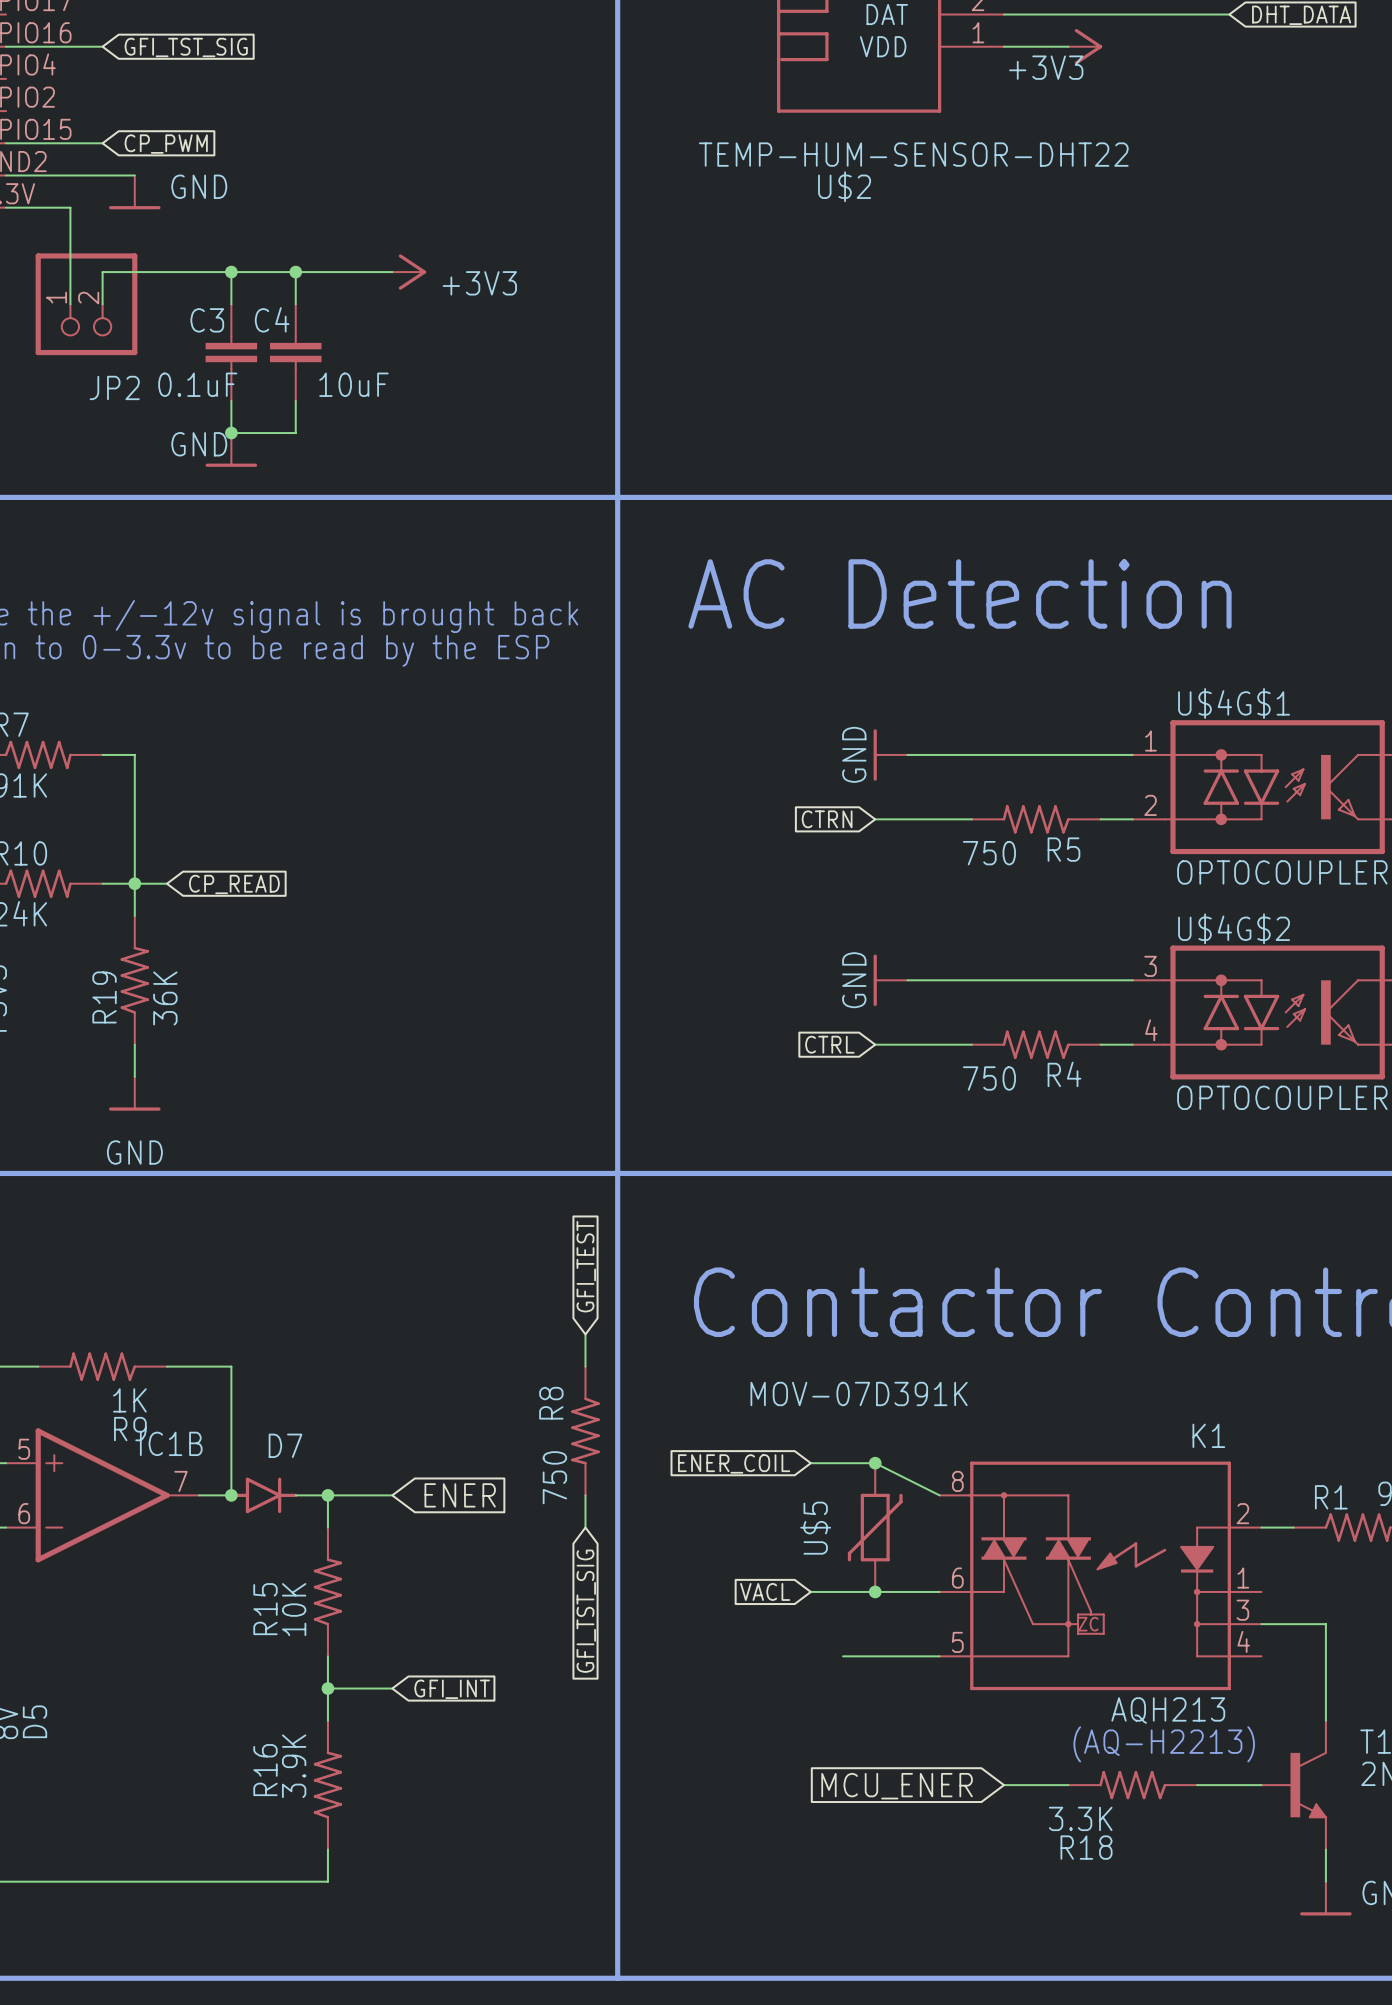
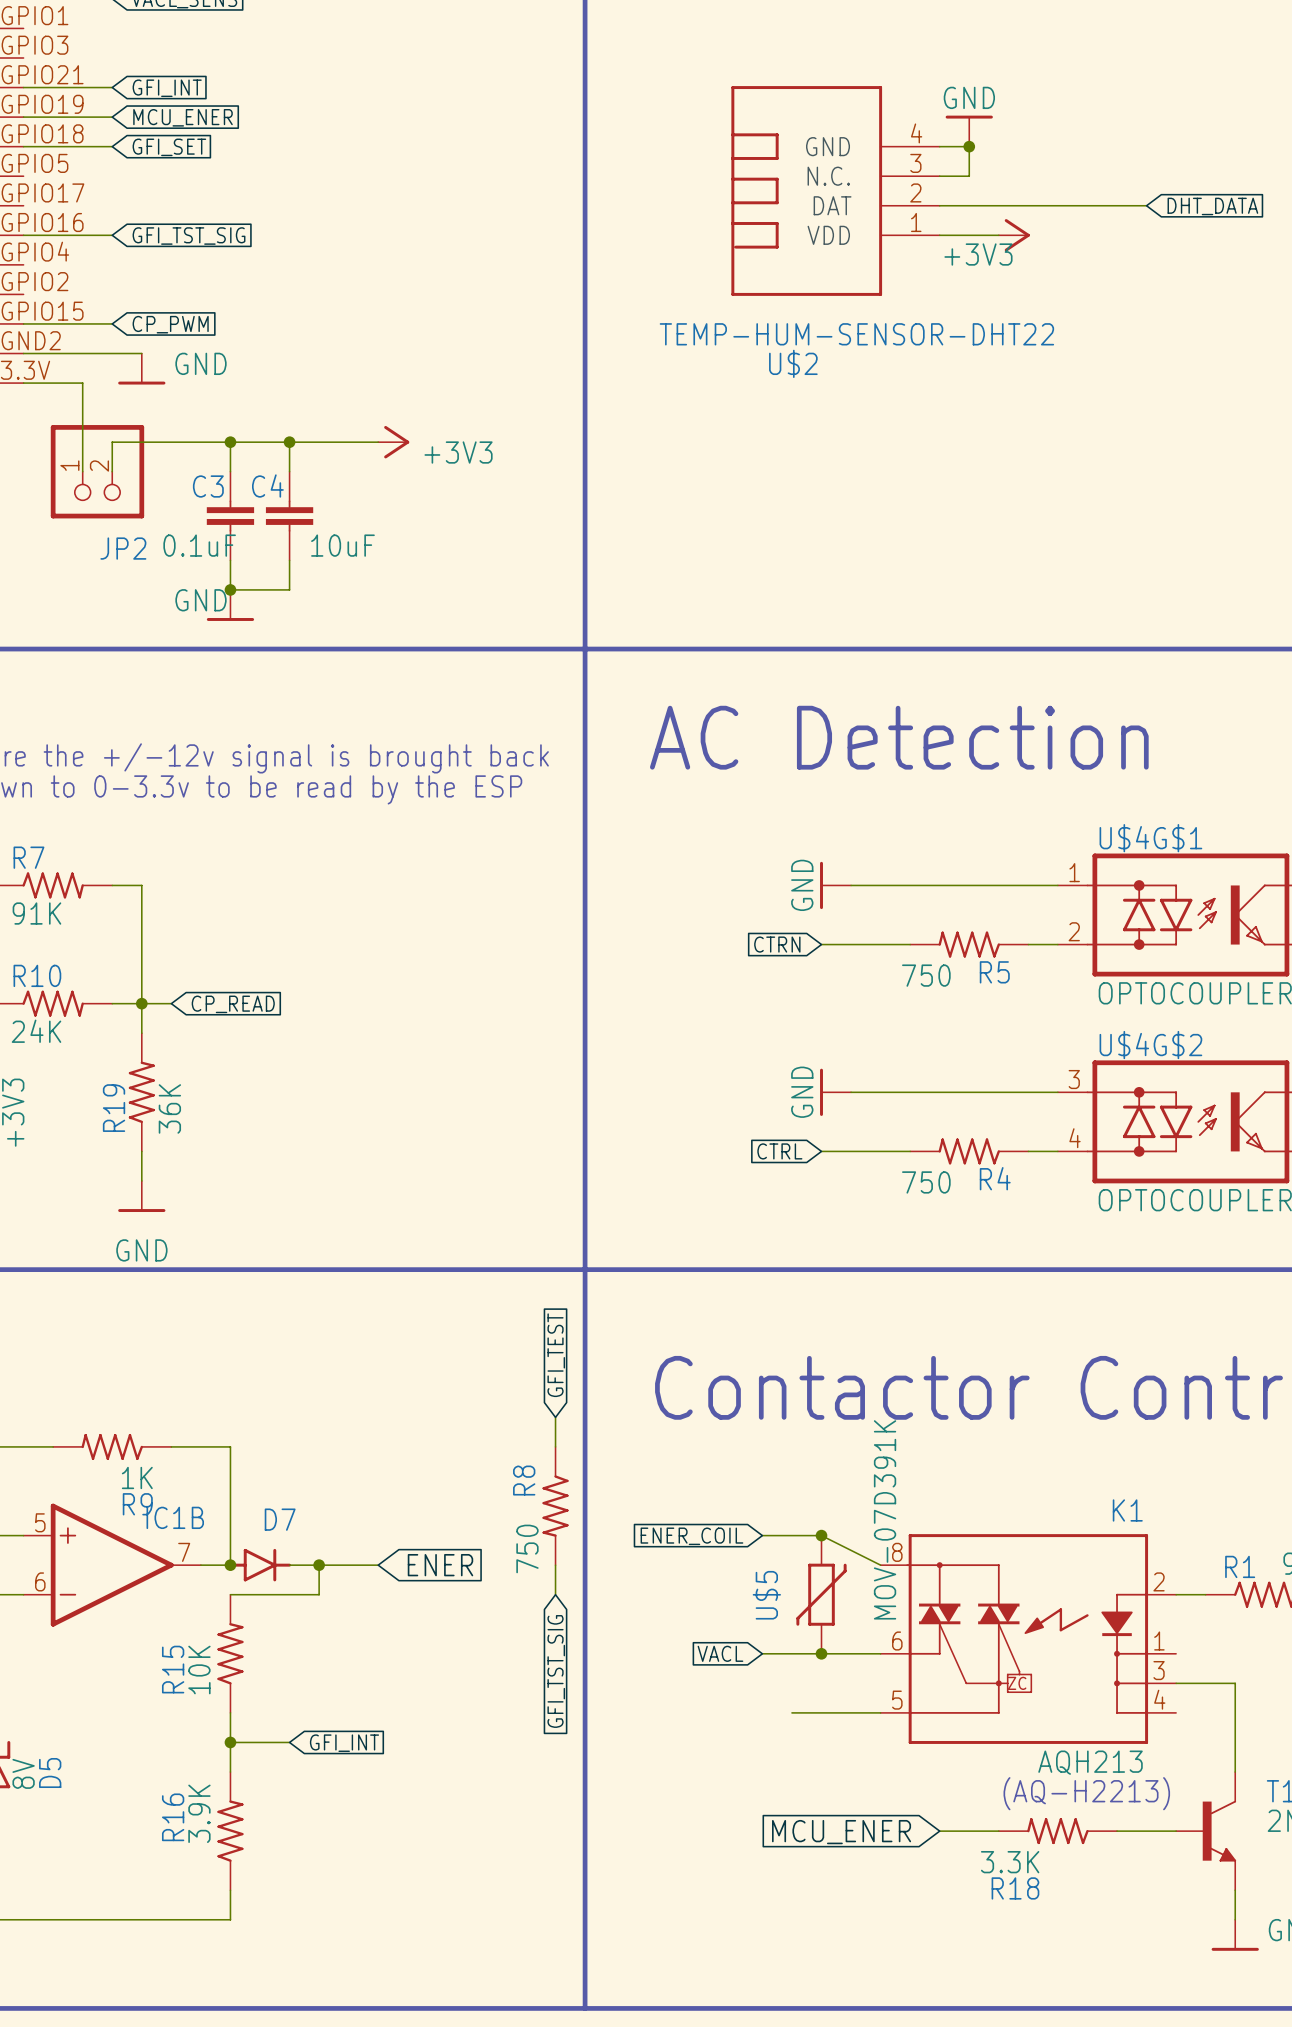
U$5 value rotation: 0° (859, 1393) -> 90° counterclockwise (885, 1519)
wire: none -> (230, 1594) (319, 1594)
R15 position: (327, 1591) -> (230, 1653)
wire: (327, 1656) (327, 1720) -> (230, 1712) (230, 1772)
junction: none -> (230, 1742)
wire: (327, 1688) (392, 1688) -> (230, 1742) (289, 1742)
junction: (327, 1688) -> none
global label position: GFI_INT (452, 1689) -> GFI_INT (344, 1743)
R16 position: (327, 1785) -> (230, 1831)
wire: (327, 1849) (327, 1881) (231, 1881) -> (230, 1890) (230, 1919)

